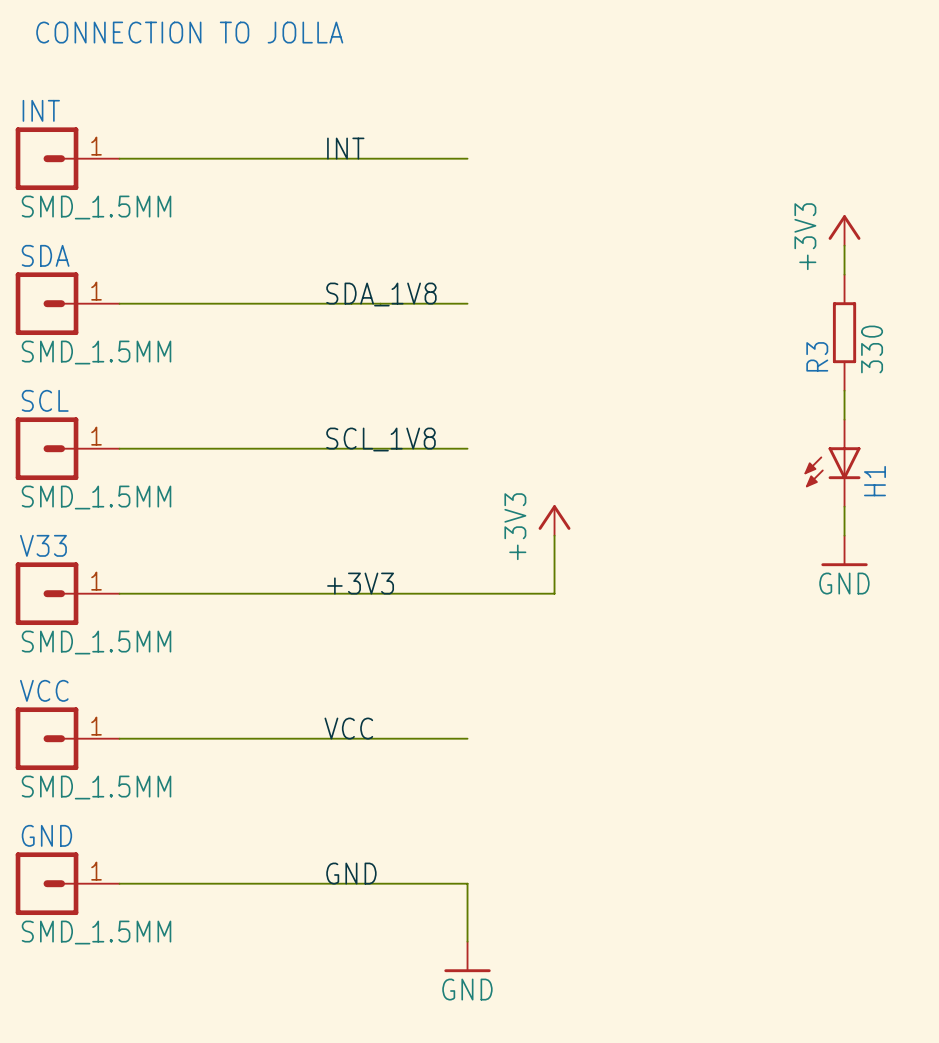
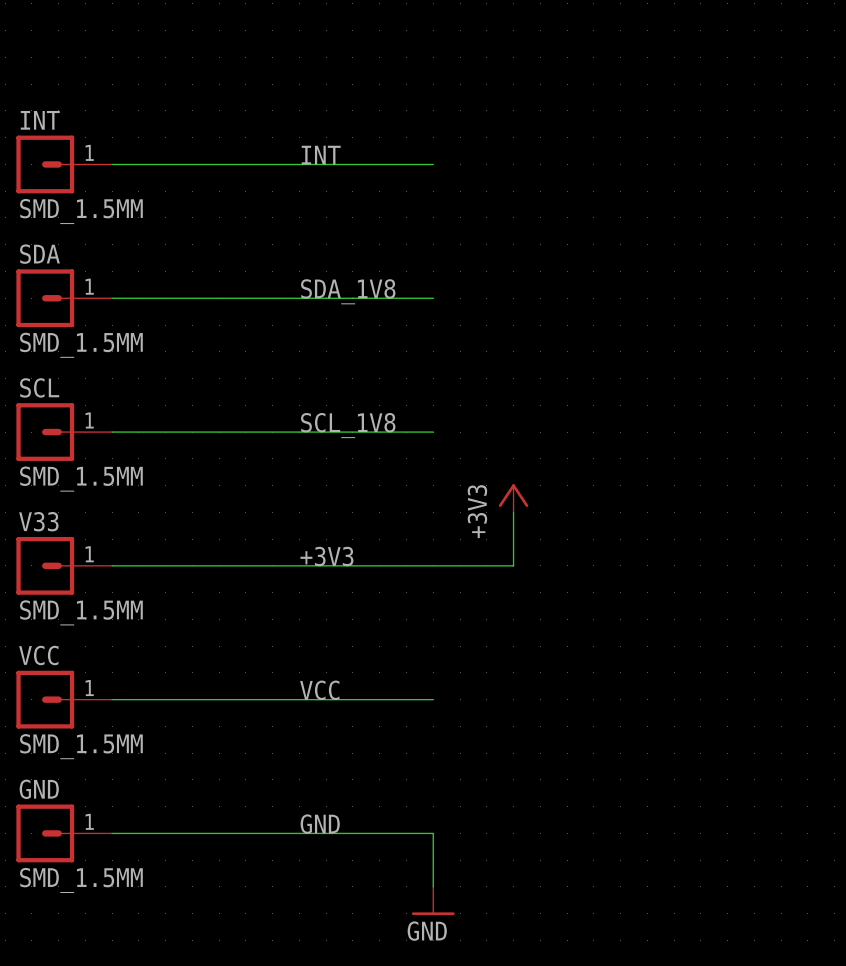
text: CONNECTION TO JOLLA (189, 32) -> none
power symbol: +3V3 (844, 230) -> none
wire: (844, 245) (844, 274) -> none
R3: 330 (844, 332) -> none
wire: (844, 390) (844, 419) -> none
H1: (832, 463) -> none
wire: (844, 506) (844, 535) -> none
power symbol: GND (844, 550) -> none

